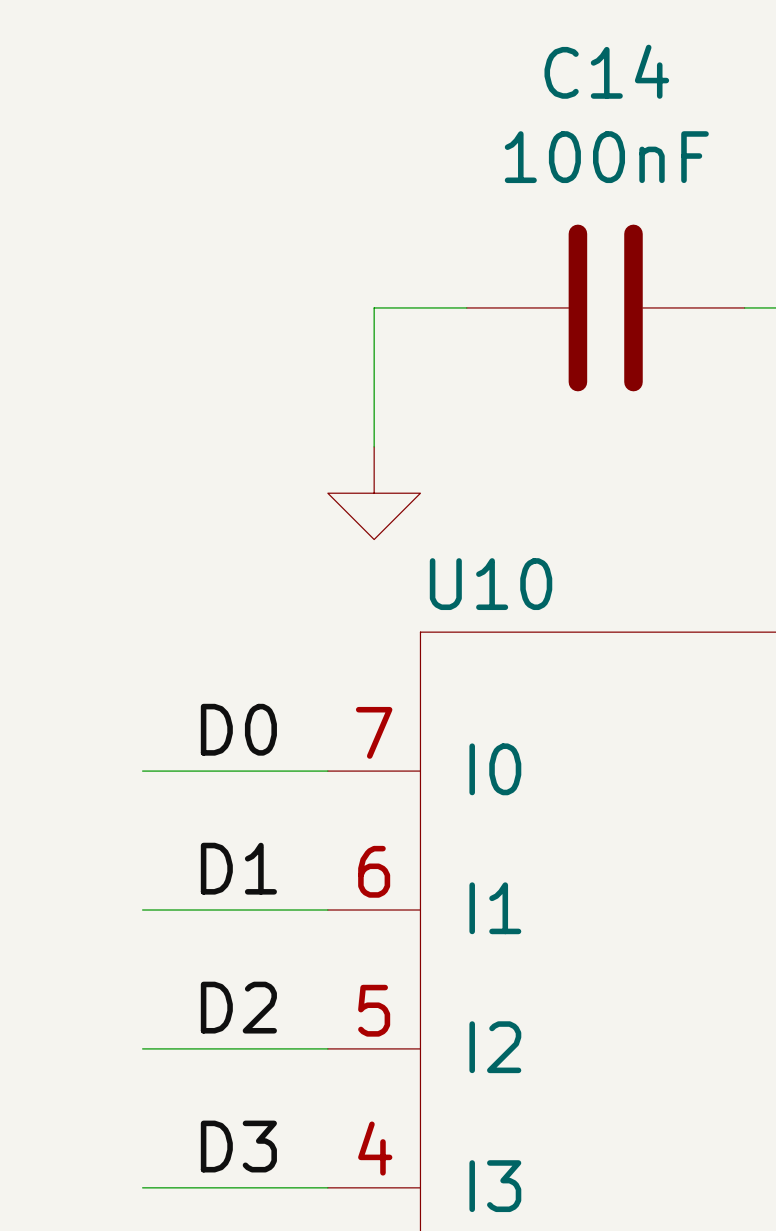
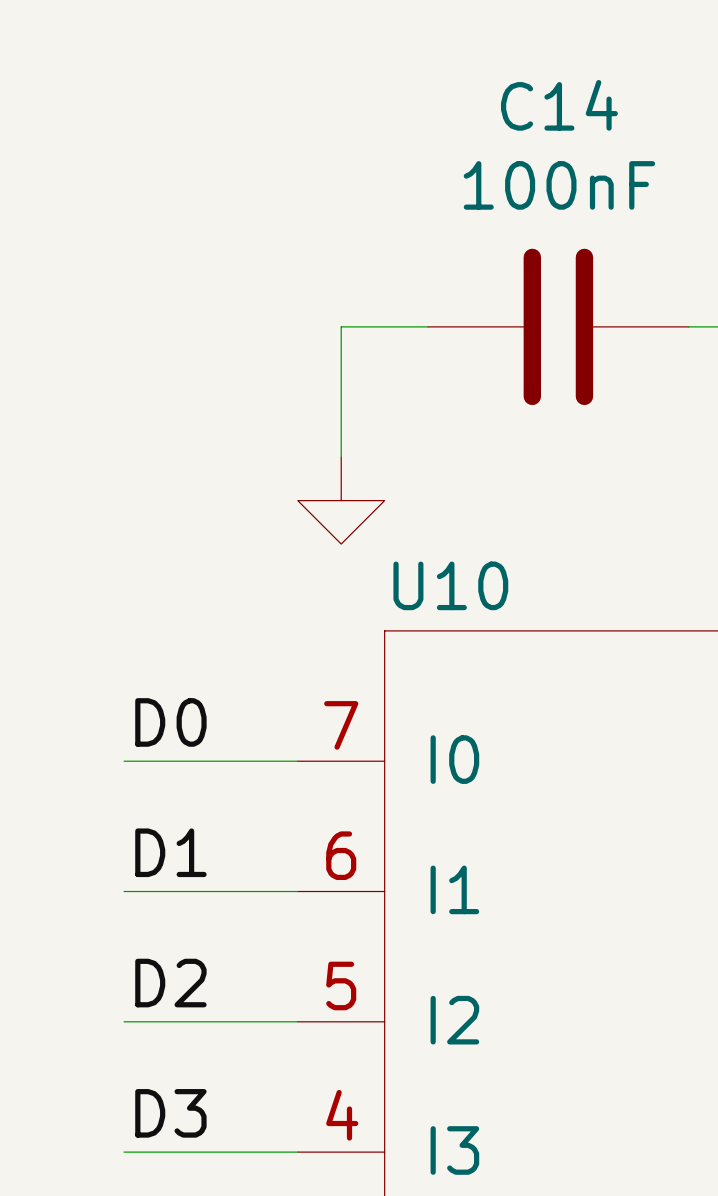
label position: D0 (238, 729) -> D0 (170, 722)
label position: D1 (238, 868) -> D1 (170, 852)
label position: D2 (238, 1007) -> D2 (170, 983)
label position: D3 (238, 1146) -> D3 (170, 1113)

